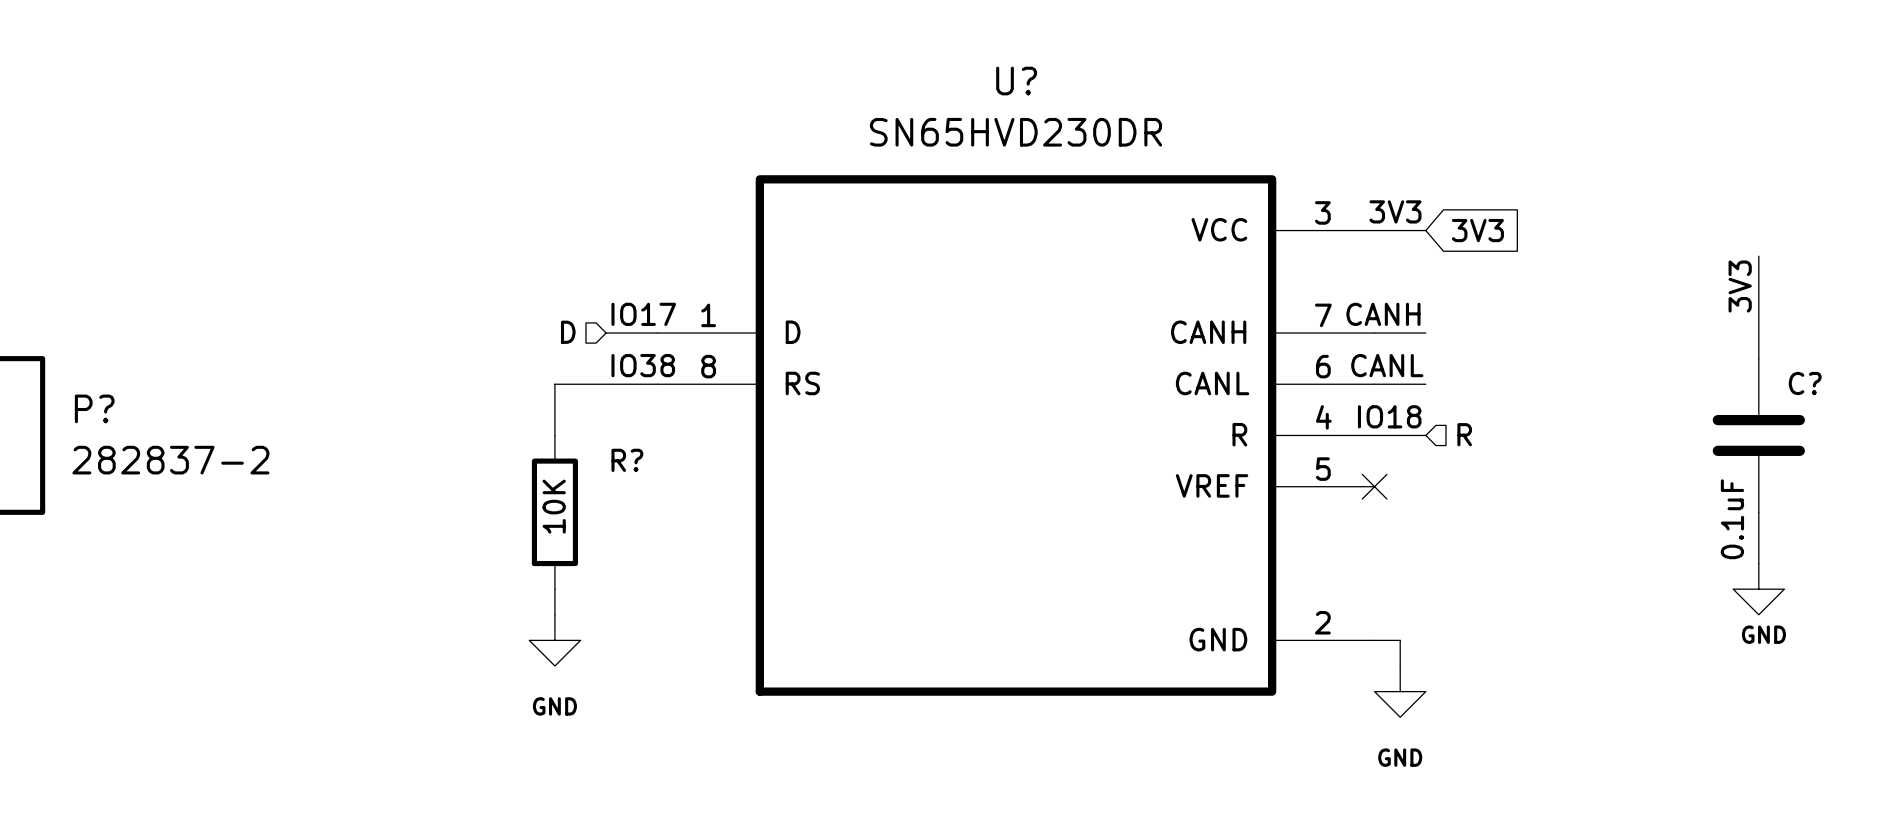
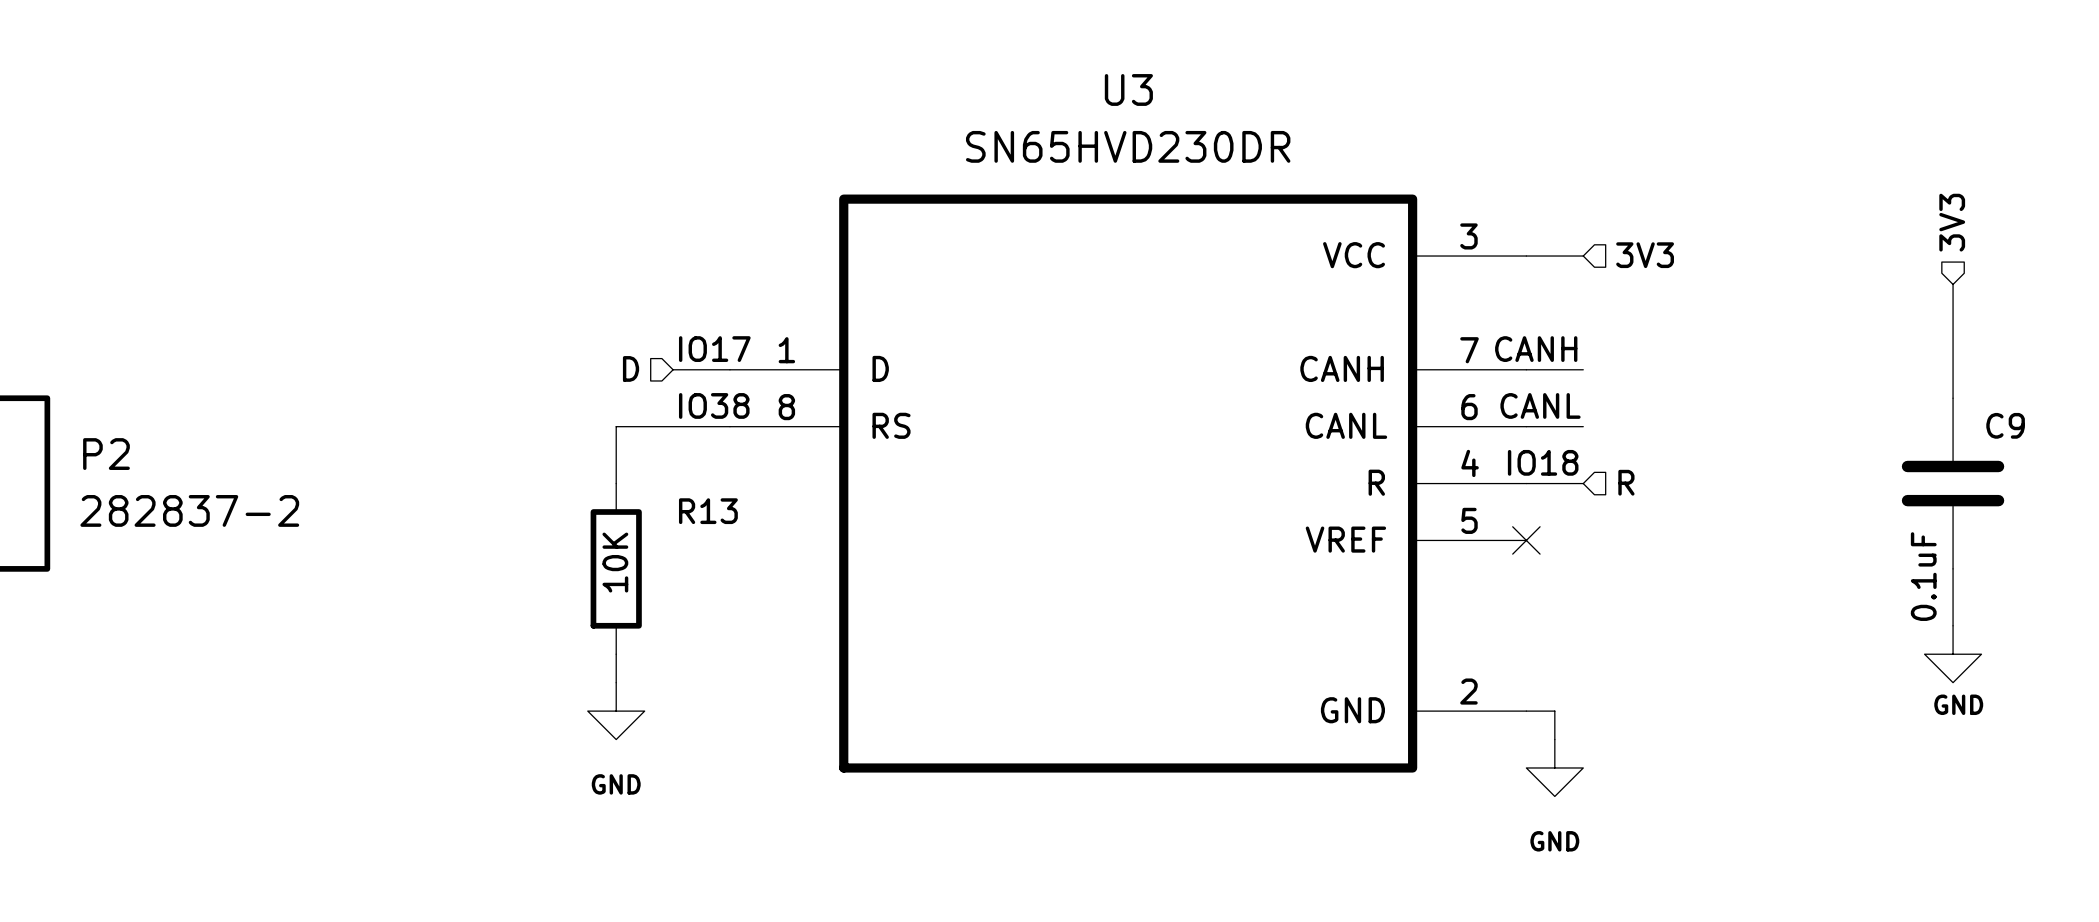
U? name: U? (1016, 81) -> U3 (1128, 89)
hierarchical label: none -> 3V3 (1952, 222)
label: 3V3 (1395, 211) -> none
hierarchical label: none -> 3V3 (1645, 255)
global label: 3V3 (1477, 230) -> none
label: 3V3 (1740, 286) -> none
C? name: C? (1805, 383) -> C9 (2005, 425)
P? name: P? (94, 408) -> P2 (106, 454)
R? name: R? (627, 460) -> R13 (708, 511)

